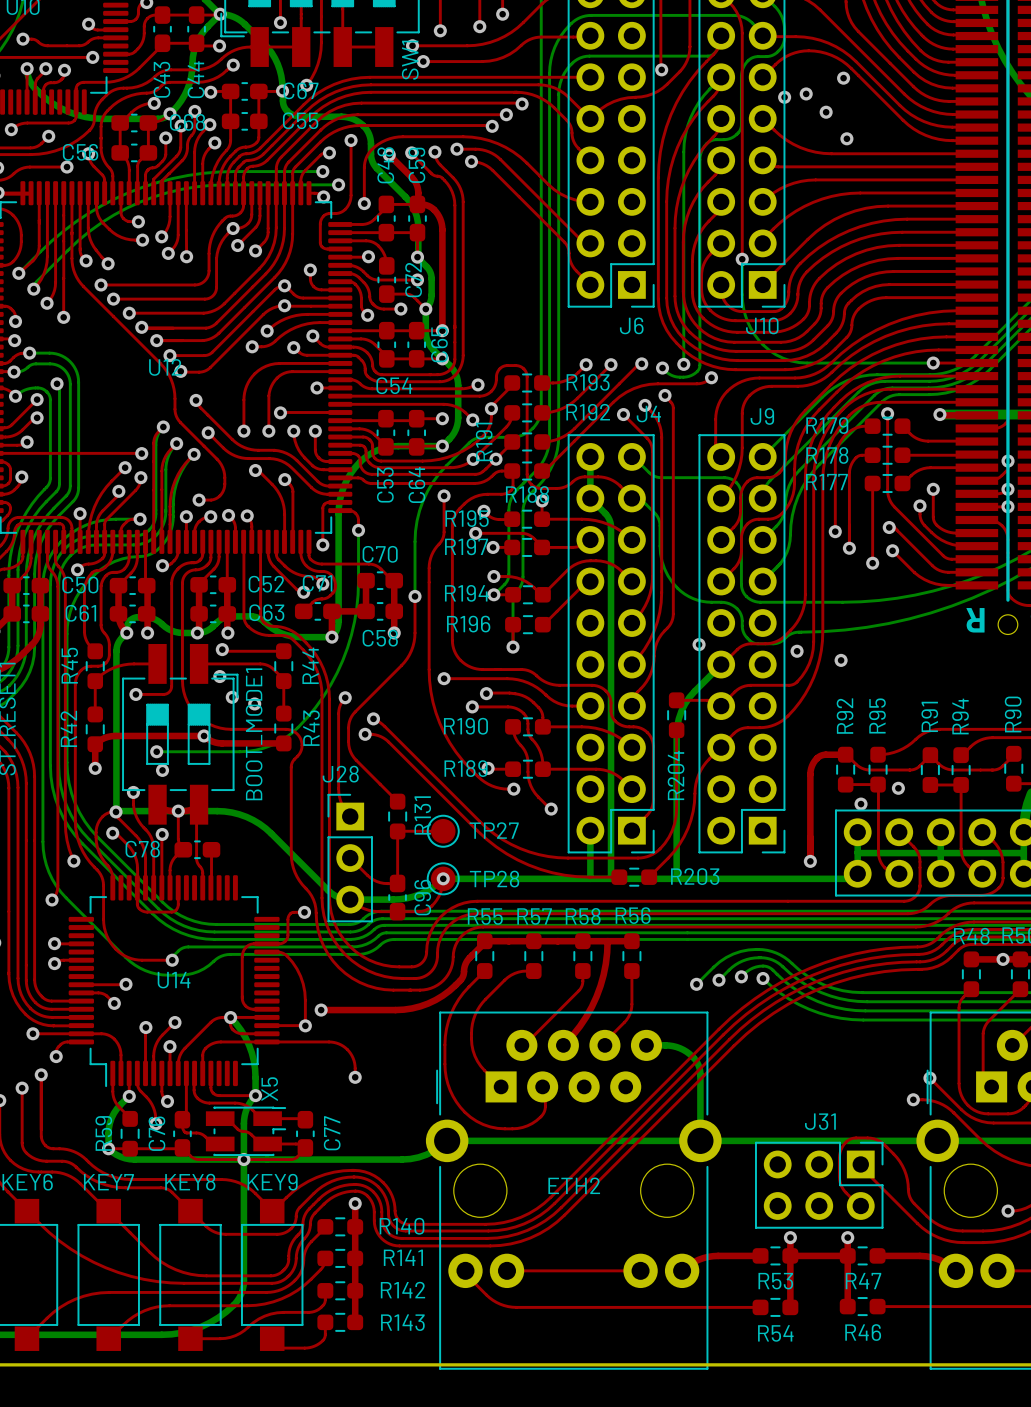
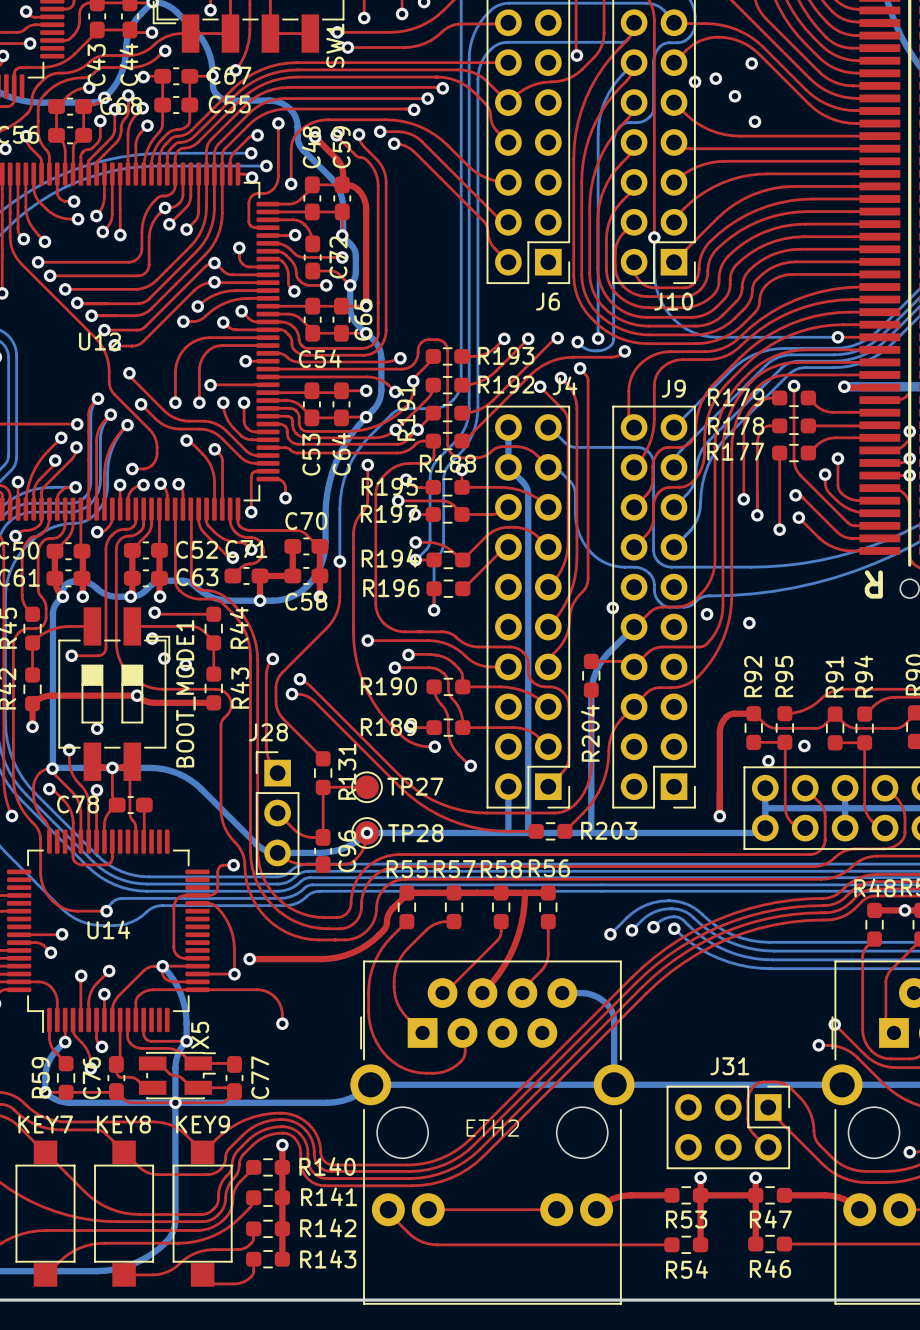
bottom track: (442, 446) (398, 446) (382, 448) (364, 458) (347, 479) (338, 506) (338, 621) (336, 629) (331, 637) -> (366, 417) (345, 442) (332, 472) (325, 504) (325, 548) (318, 571) (307, 586) (295, 594) (282, 599) (260, 600)
bottom track: (358, 530) (358, 594) (351, 634) (337, 672) (323, 696) (307, 717) (285, 737) (271, 745) (255, 750) (156, 751) -> none
via: (156, 751) -> none

